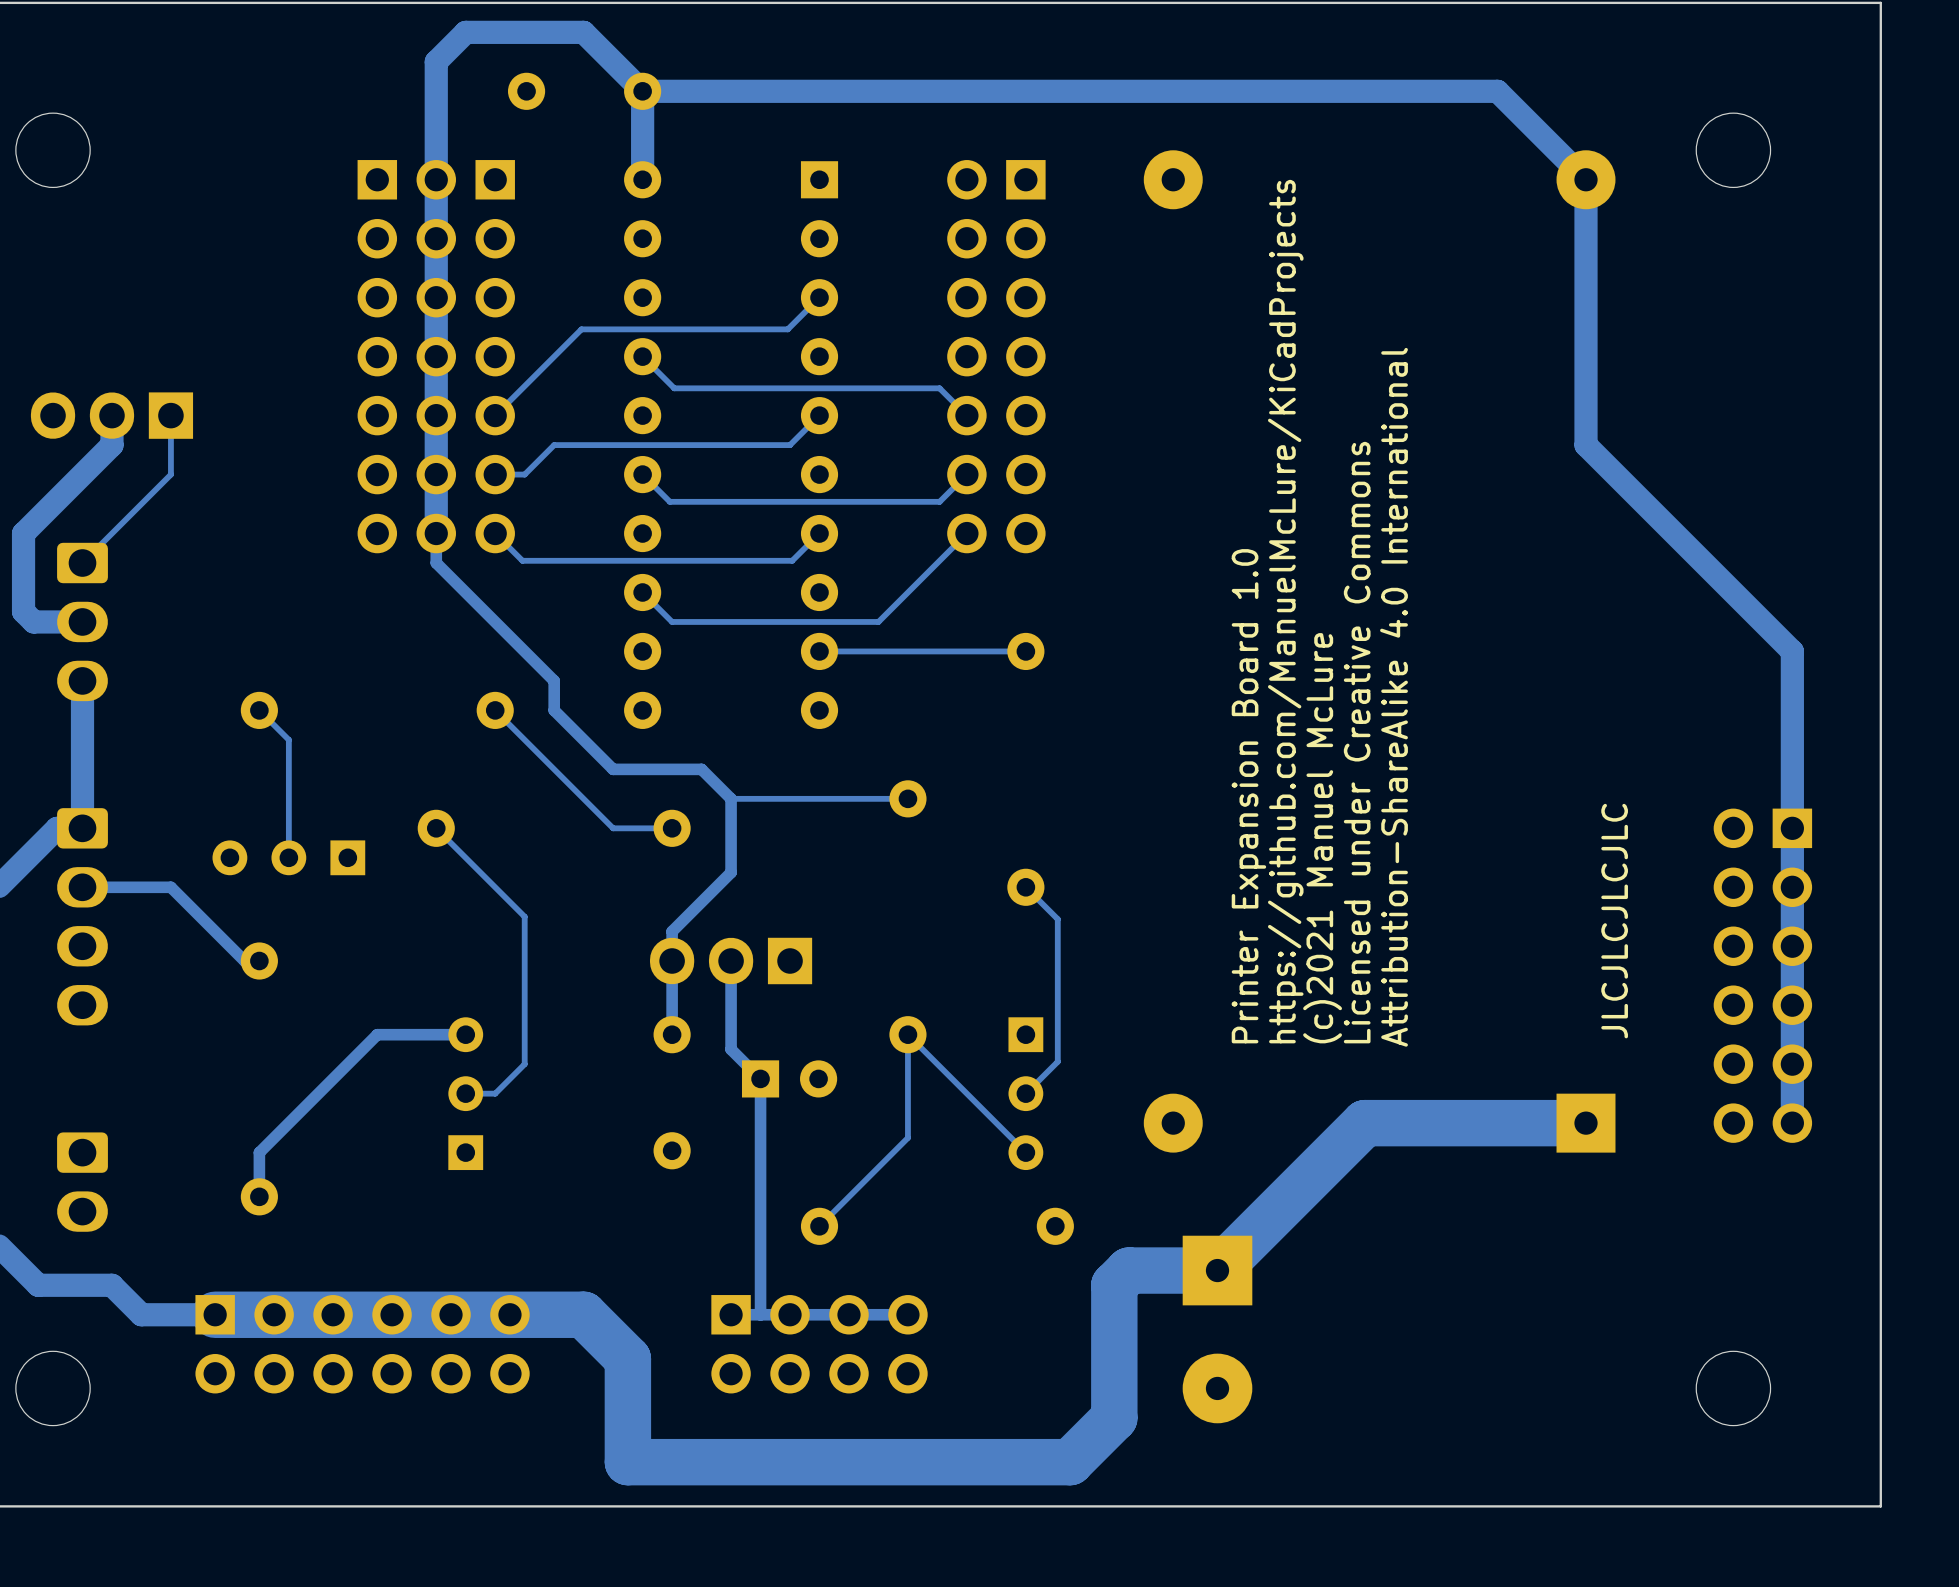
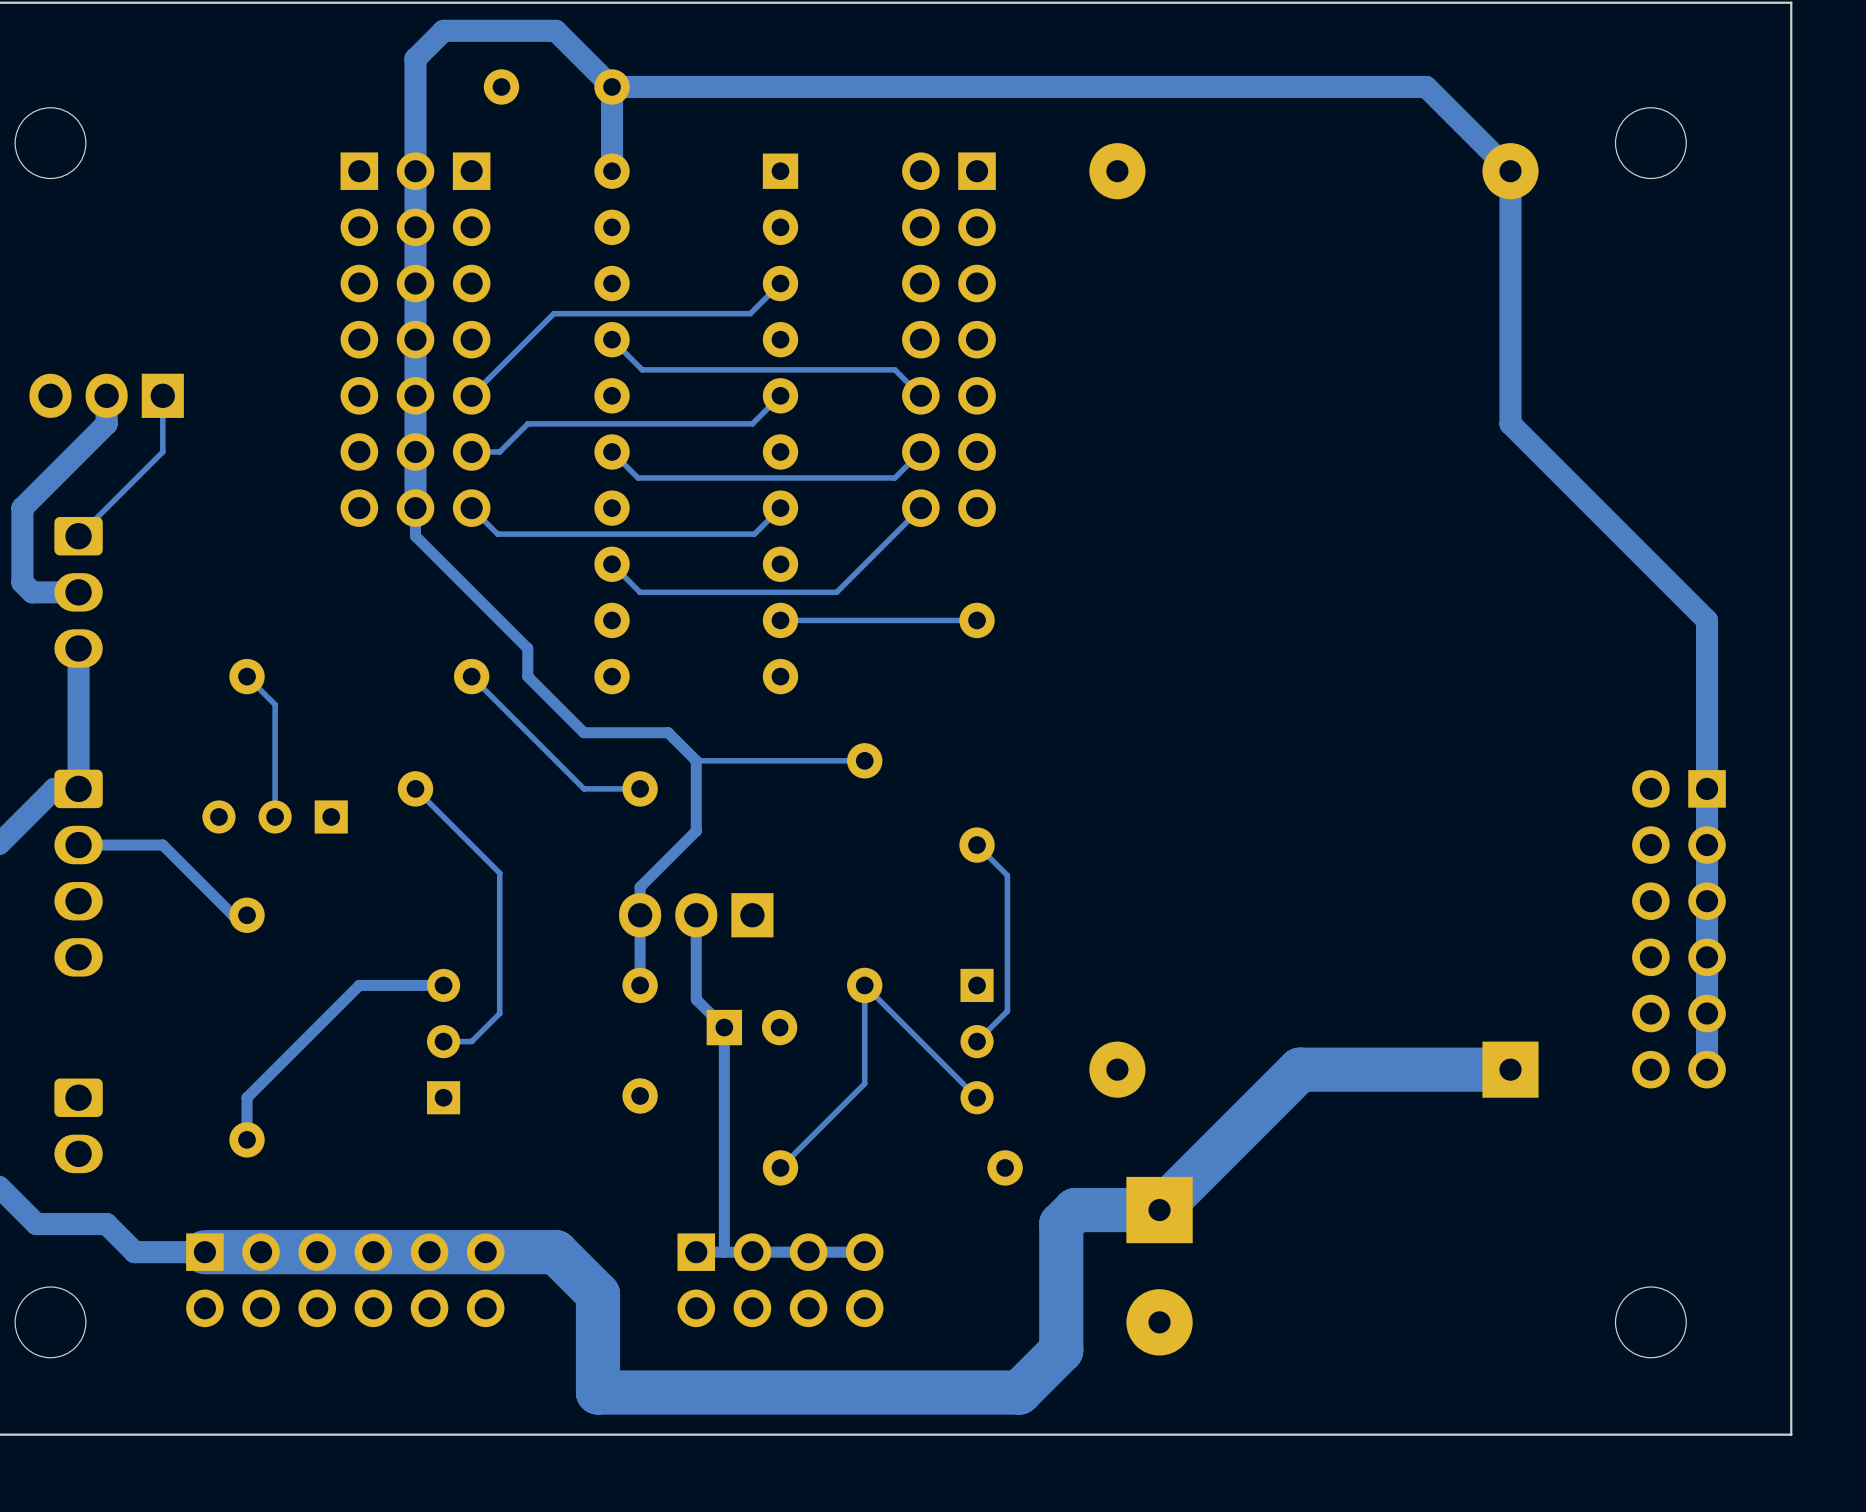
text: https://github.com/ManuelMcLure/KiCadProjects (1285, 611) -> none
text: Attribution-ShareAlike 4.0 International (1394, 697) -> none
text: Licensed under Creative Commons (1357, 742) -> none
text: Printer Expansion Board 1.0 (1248, 796) -> none
text: (c)2021 Manuel McLure (1322, 838) -> none
text: JLCJLCJLCJLC (1614, 921) -> none

